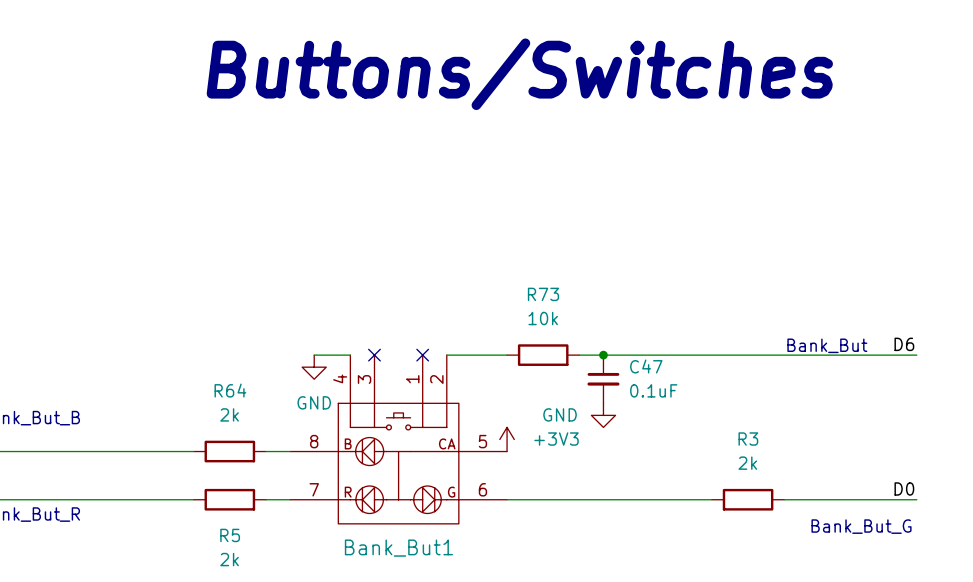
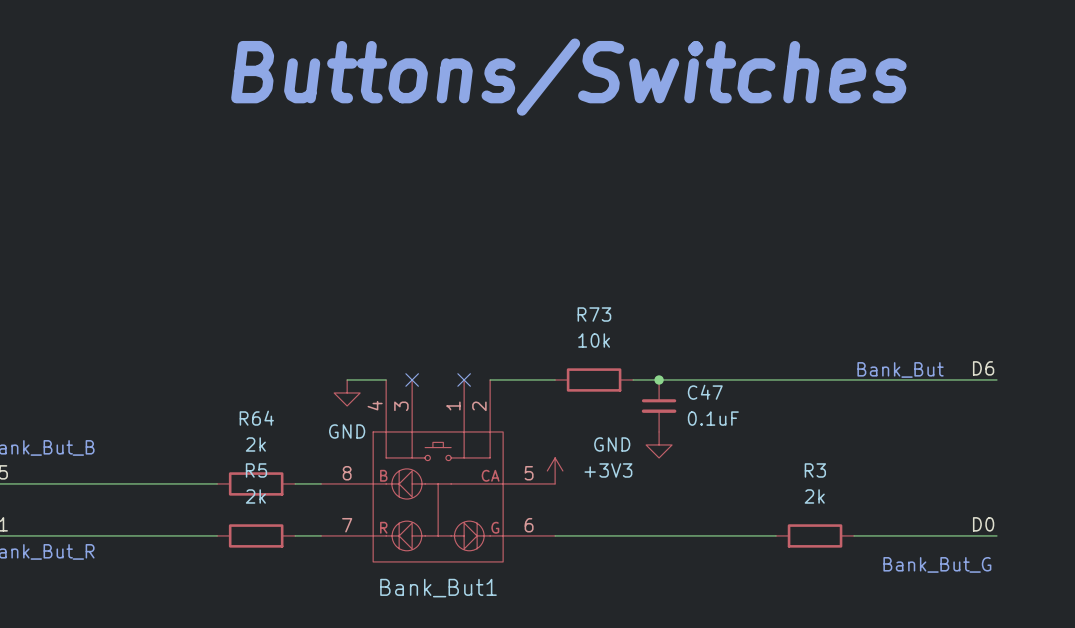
R5 name position: R5 (230, 535) -> R5 (256, 470)
R5 text position: 2k (229, 559) -> 2k (255, 496)

